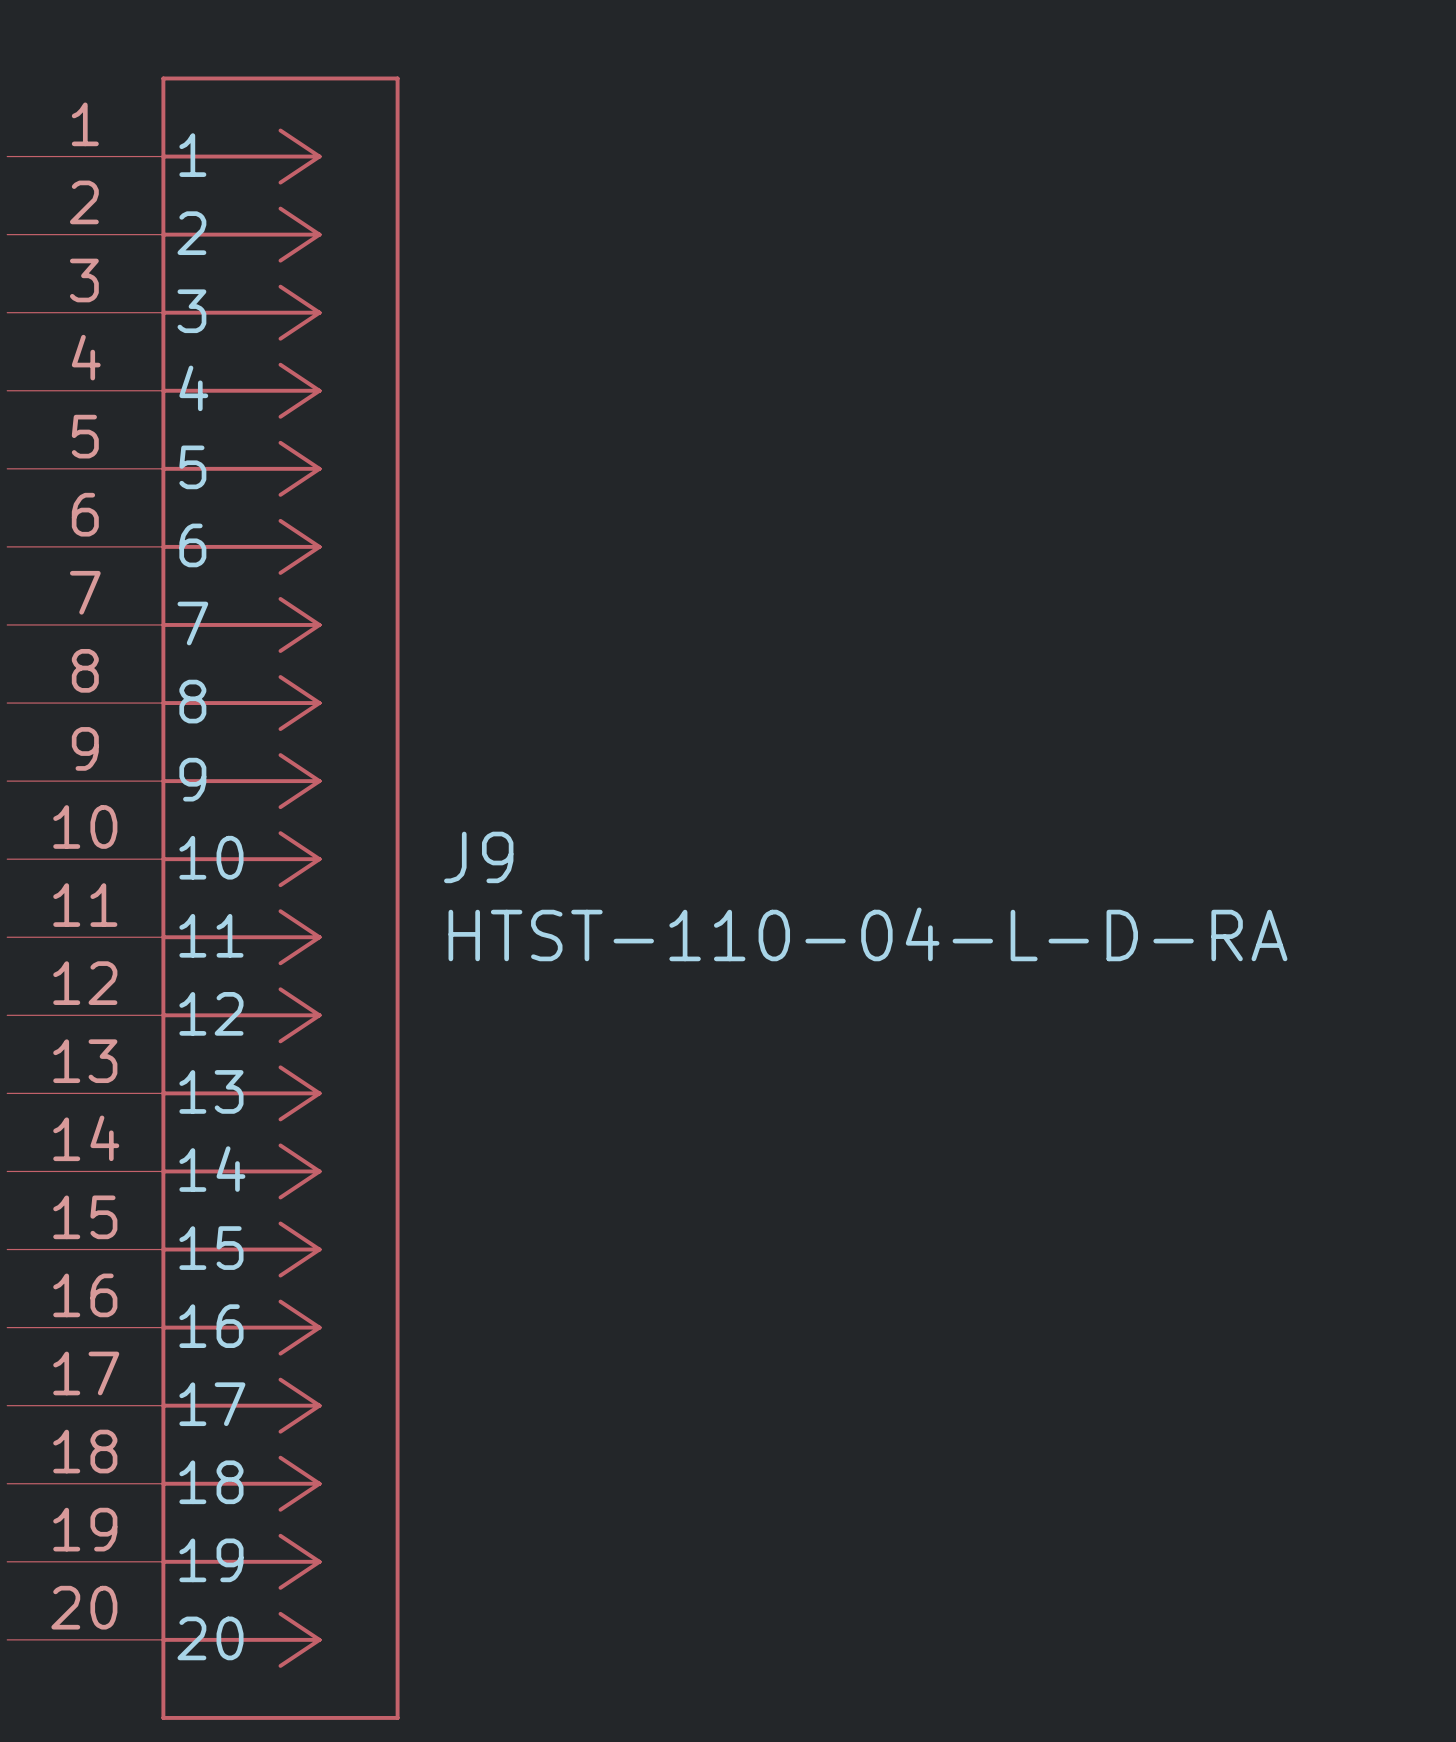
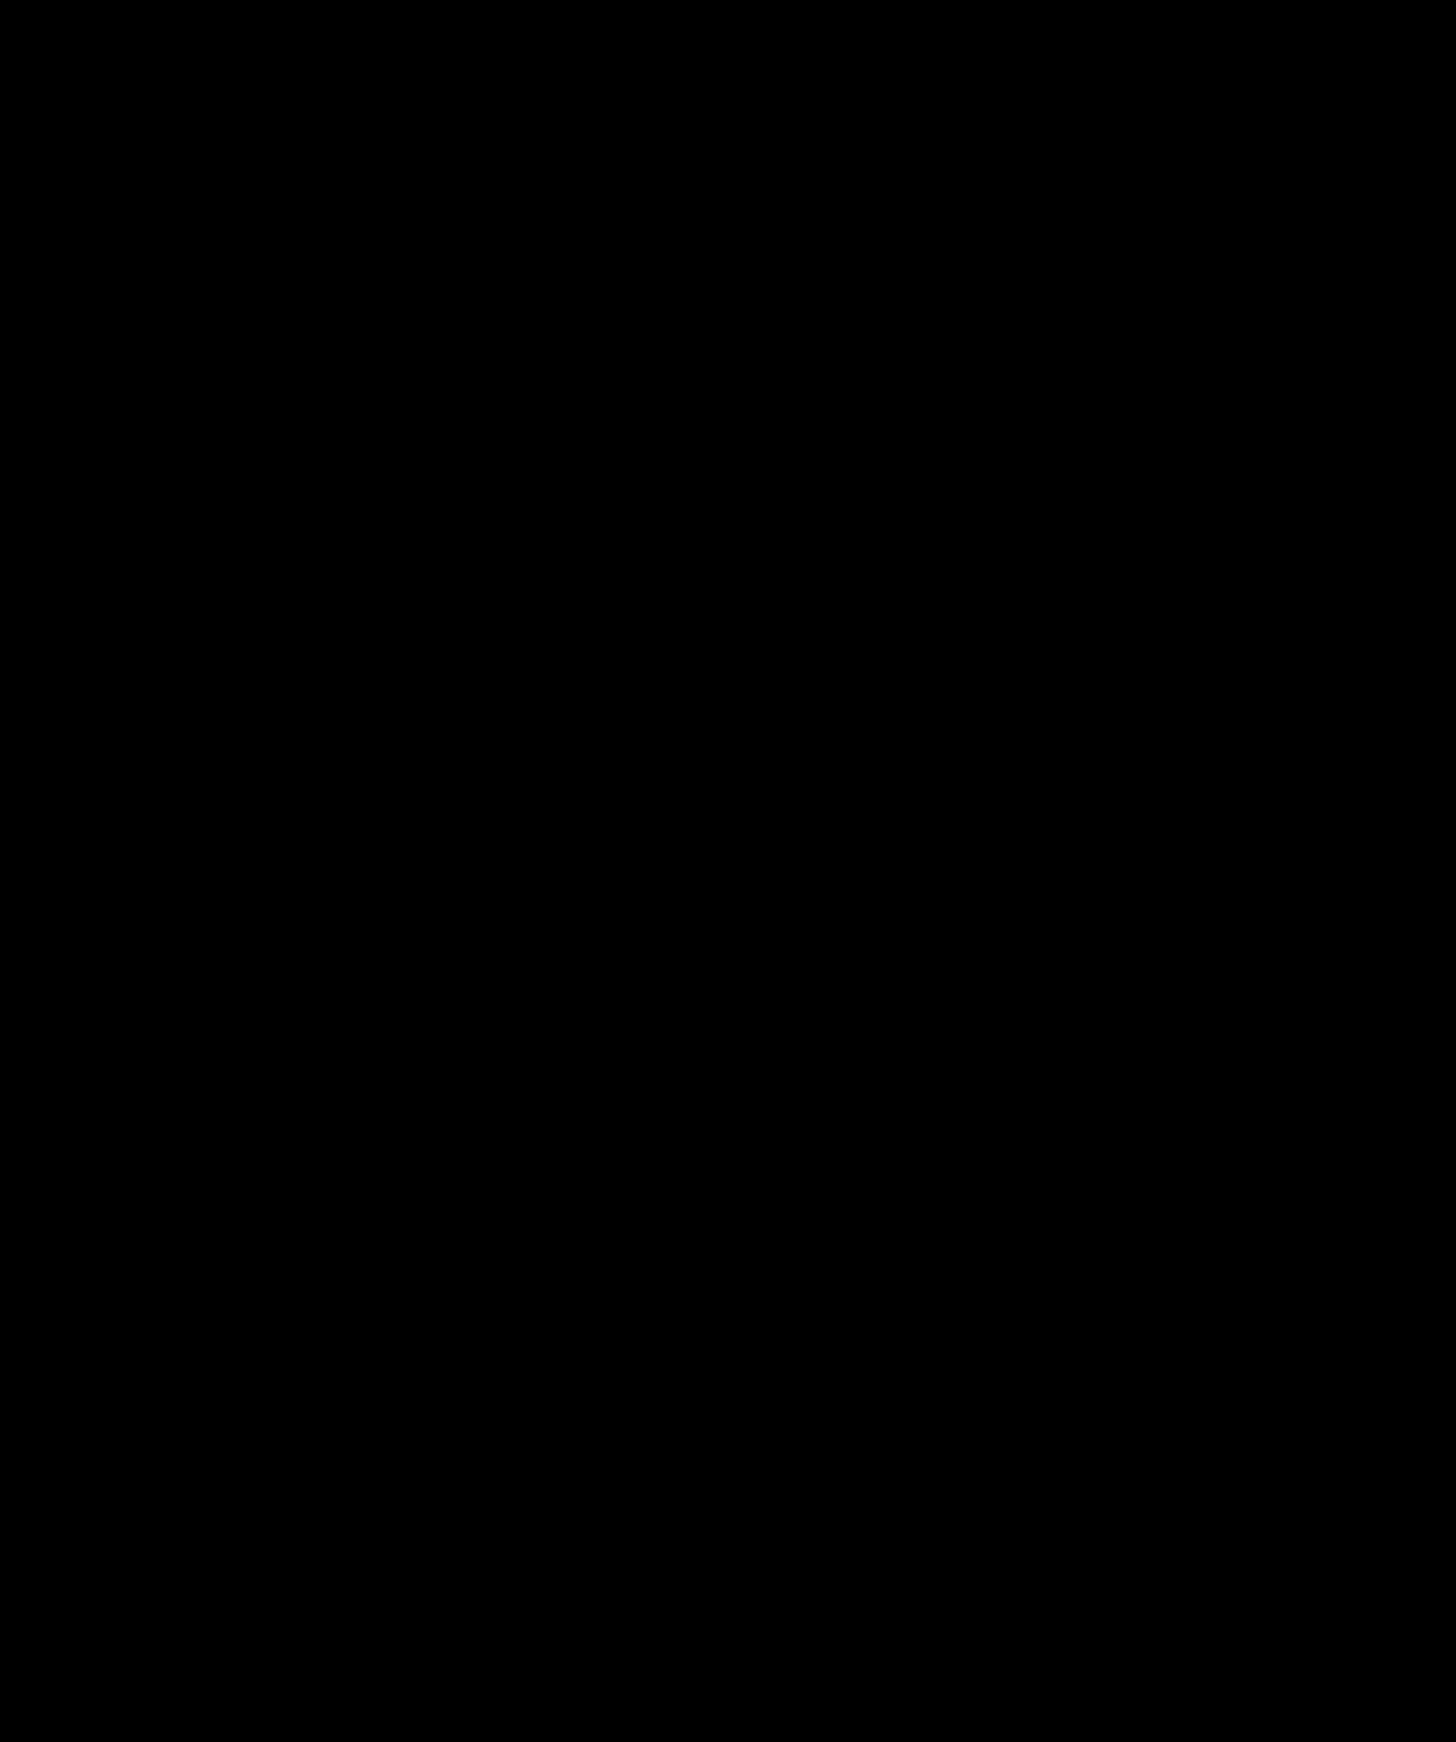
J9: HTST-110-04-L-D-RA (203, 898) -> none

